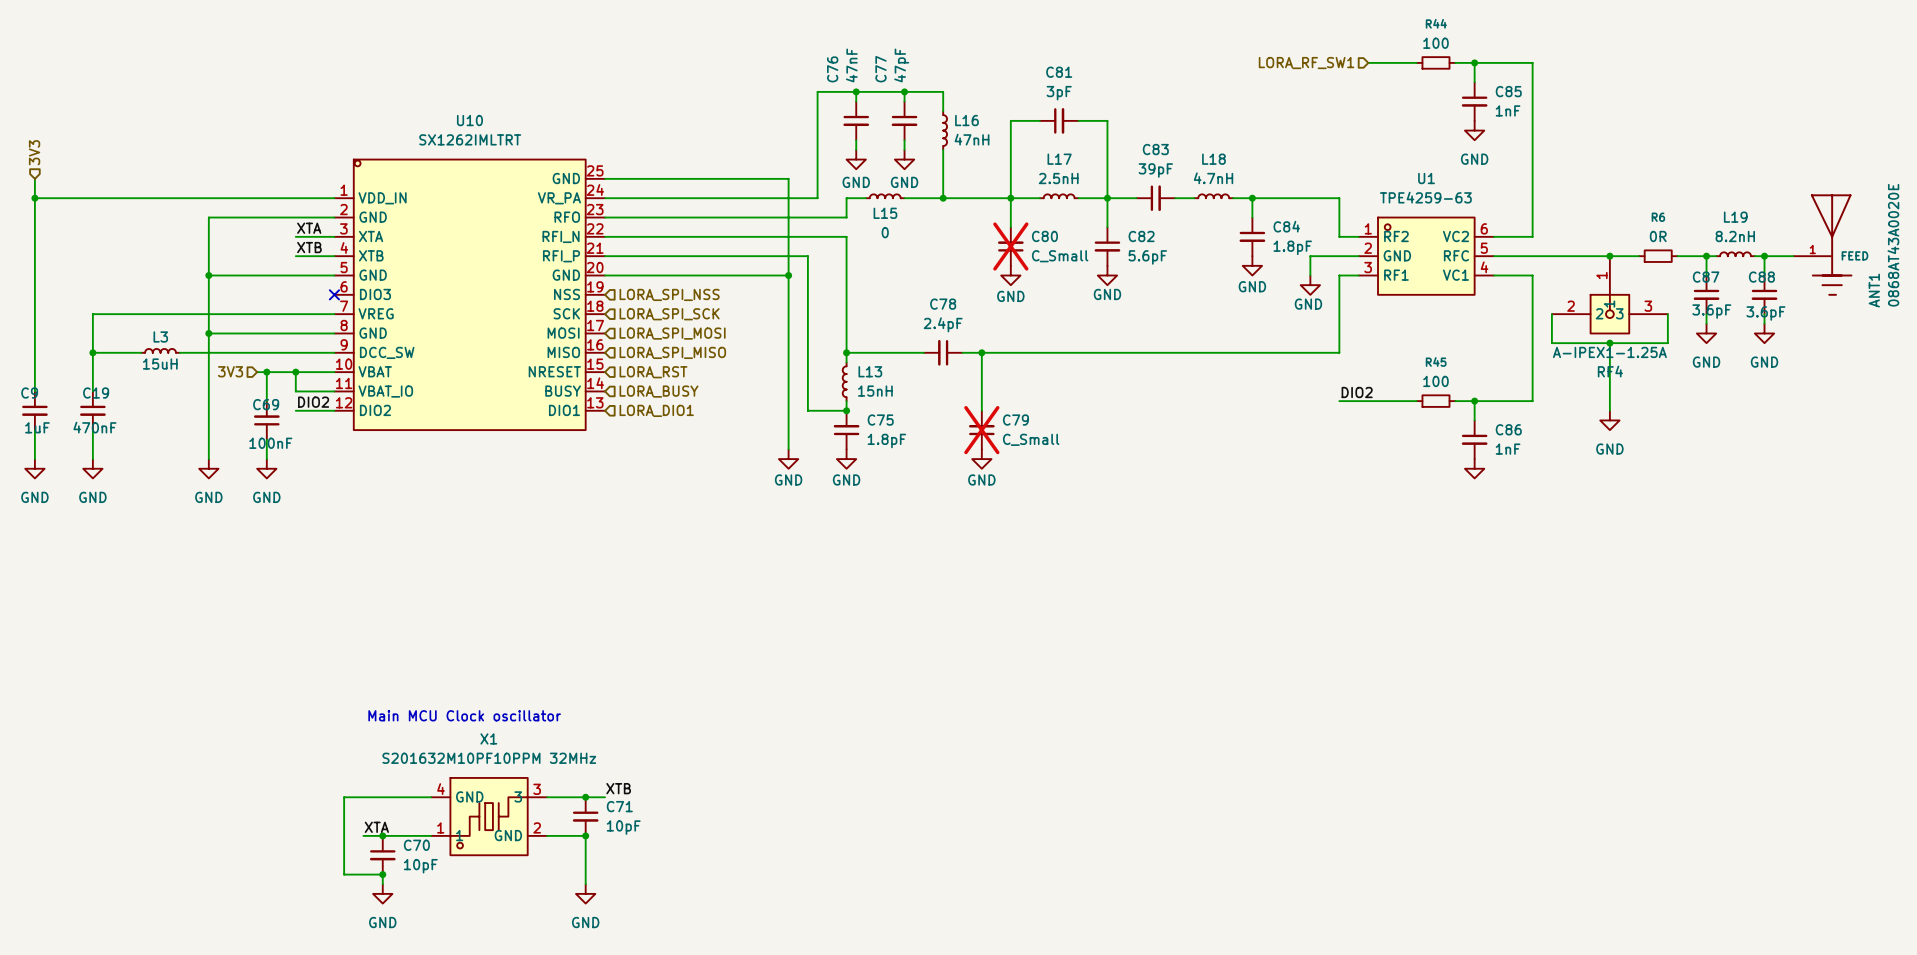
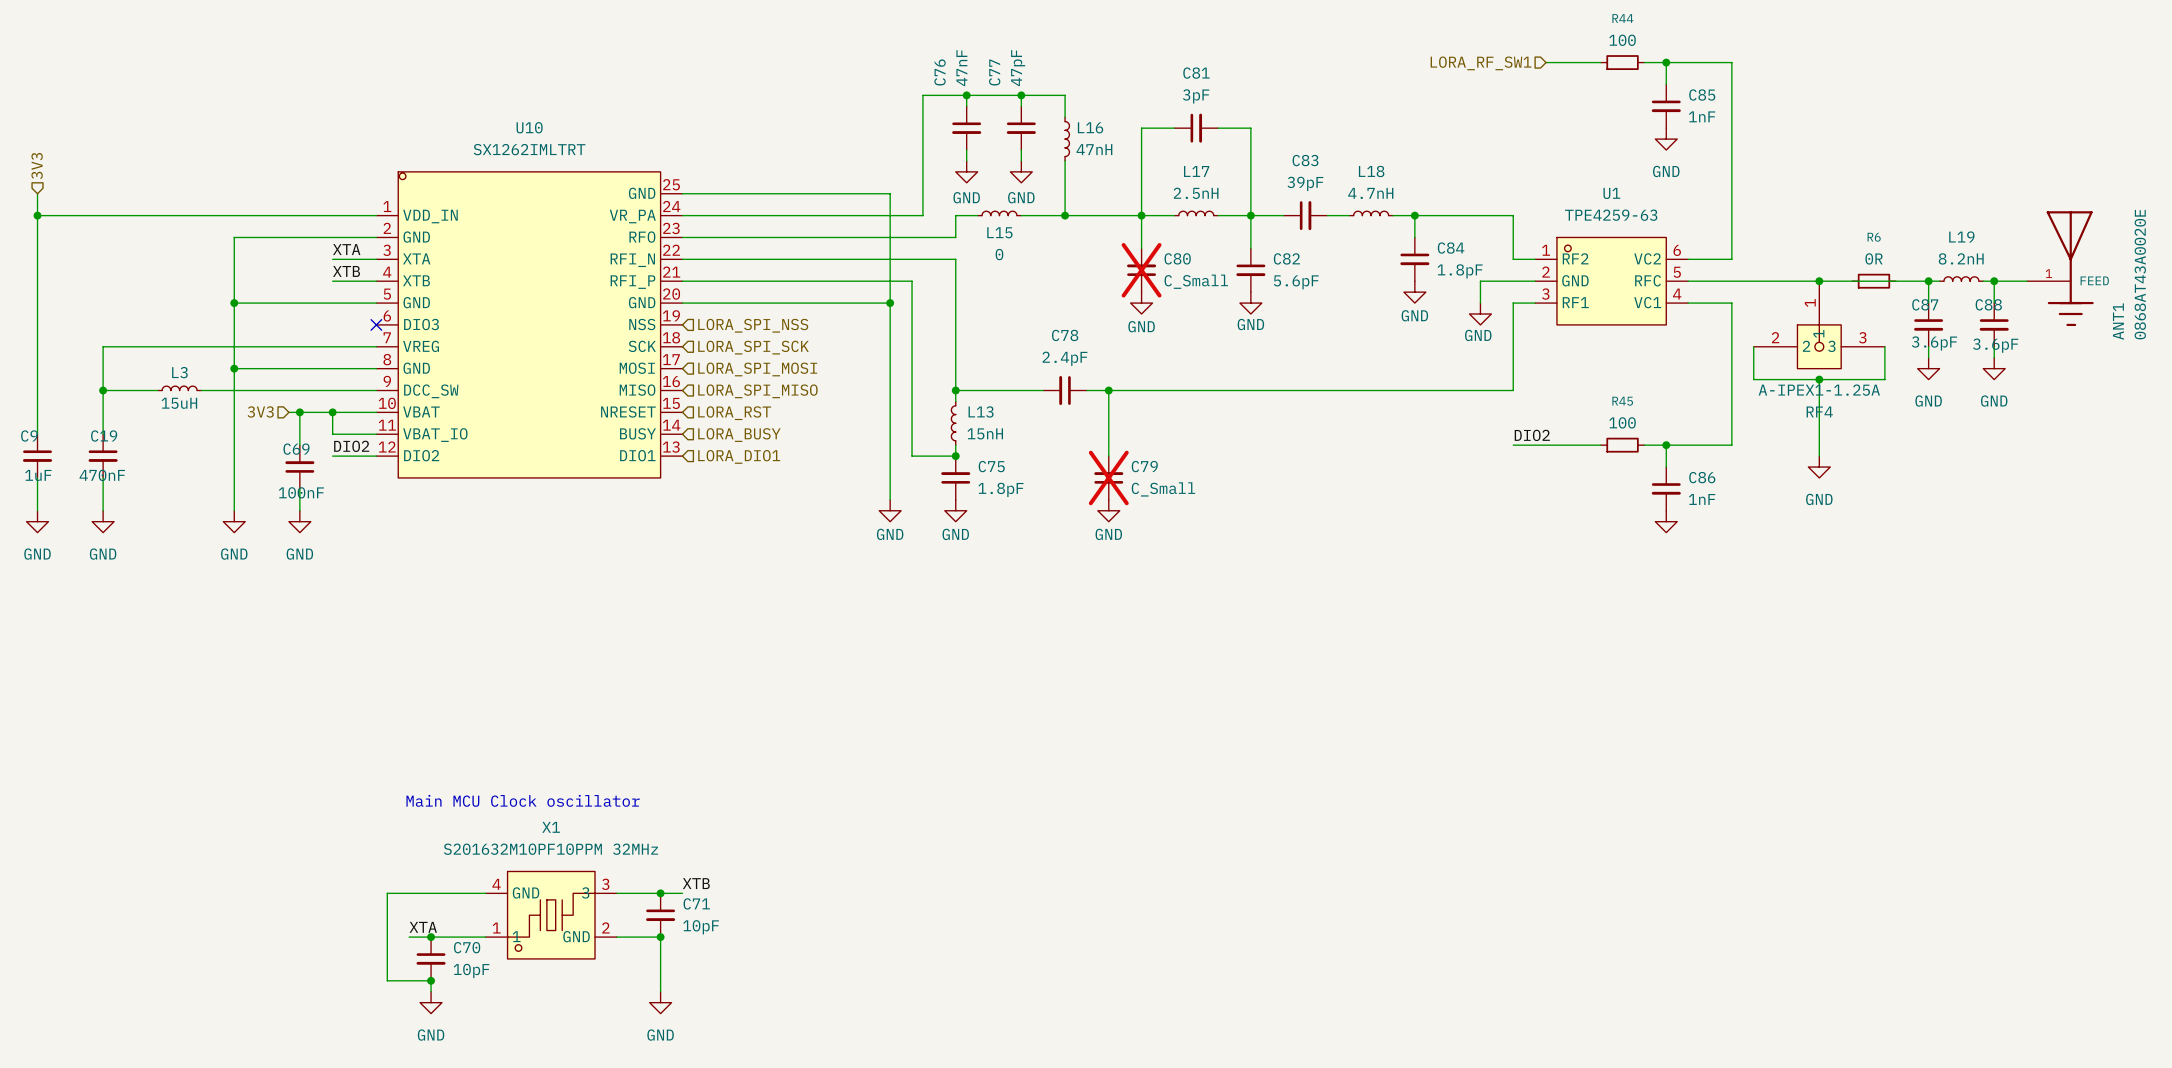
wire: none -> (1852, 281) (1895, 281)

